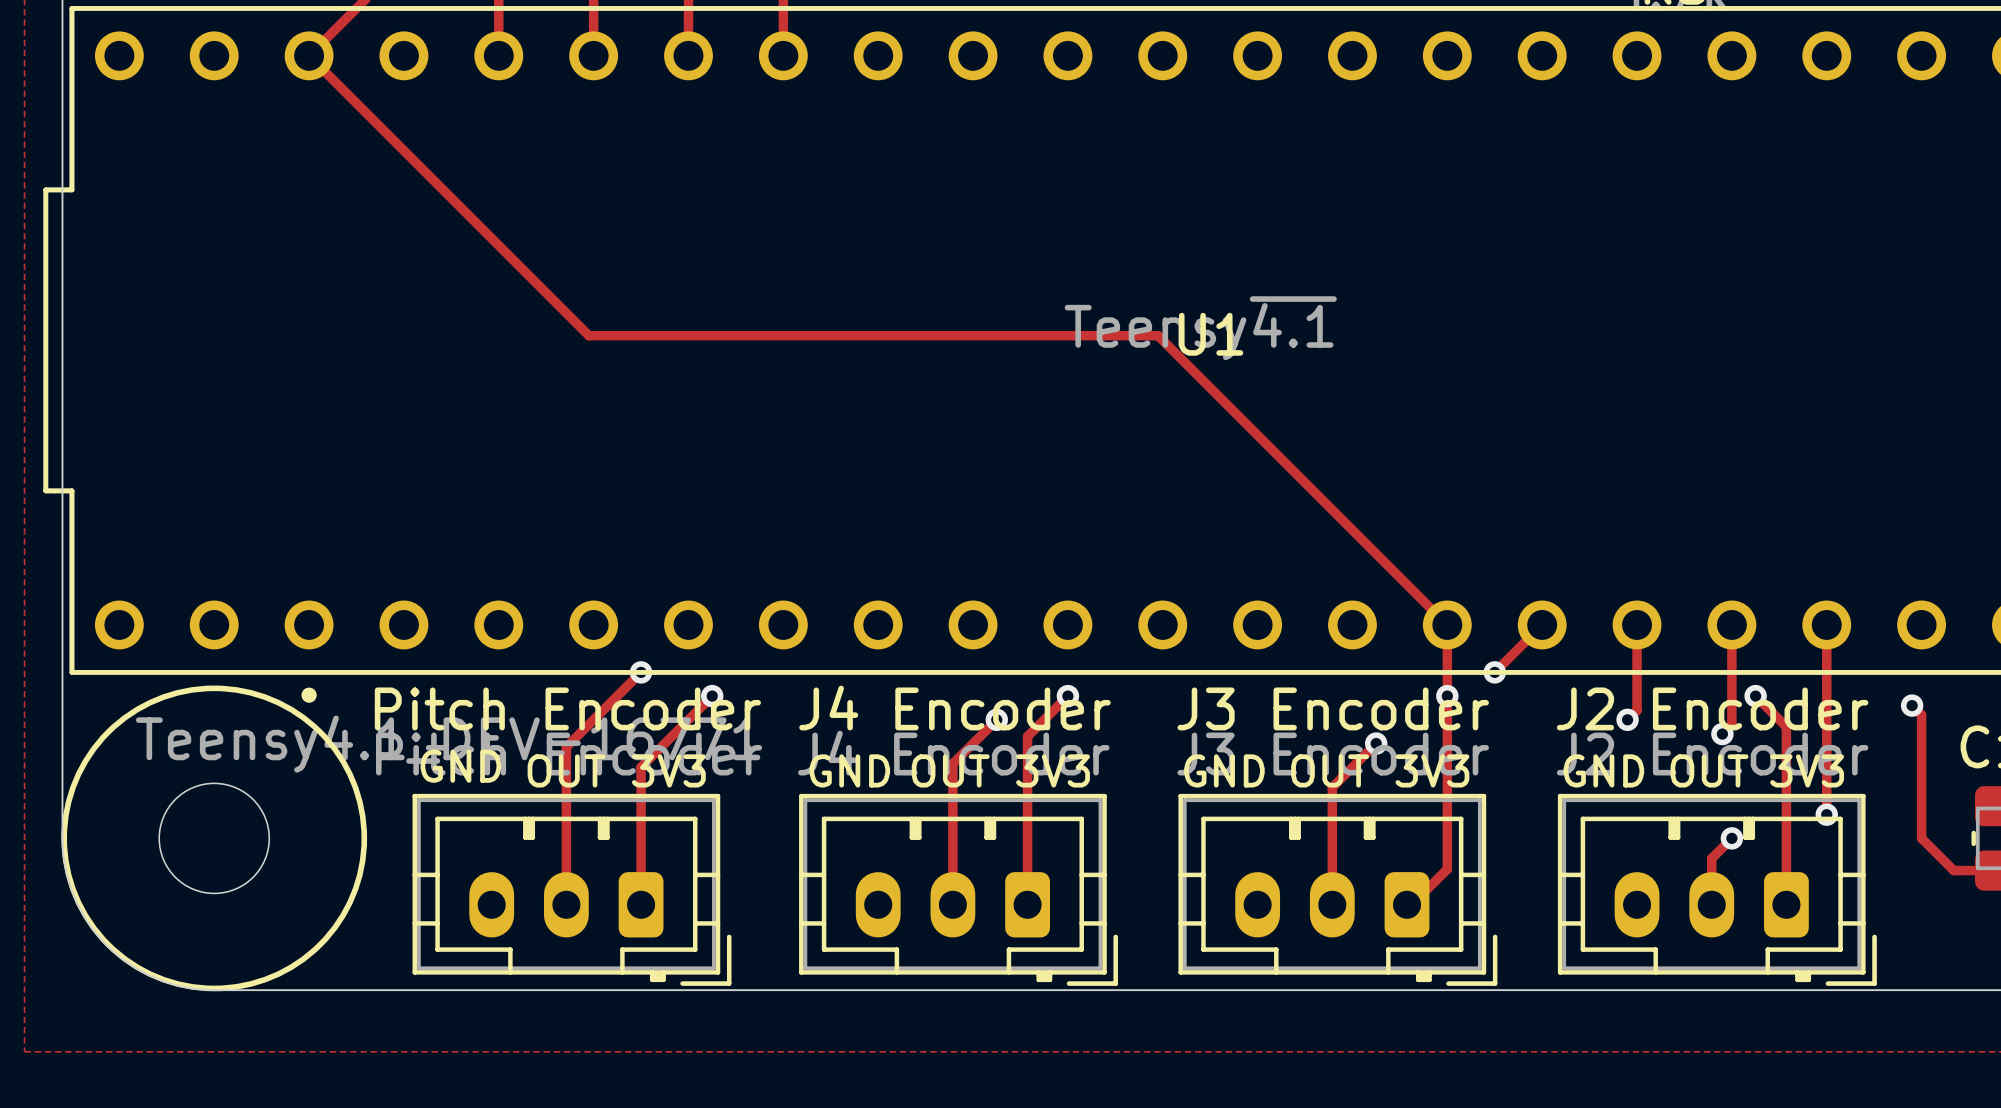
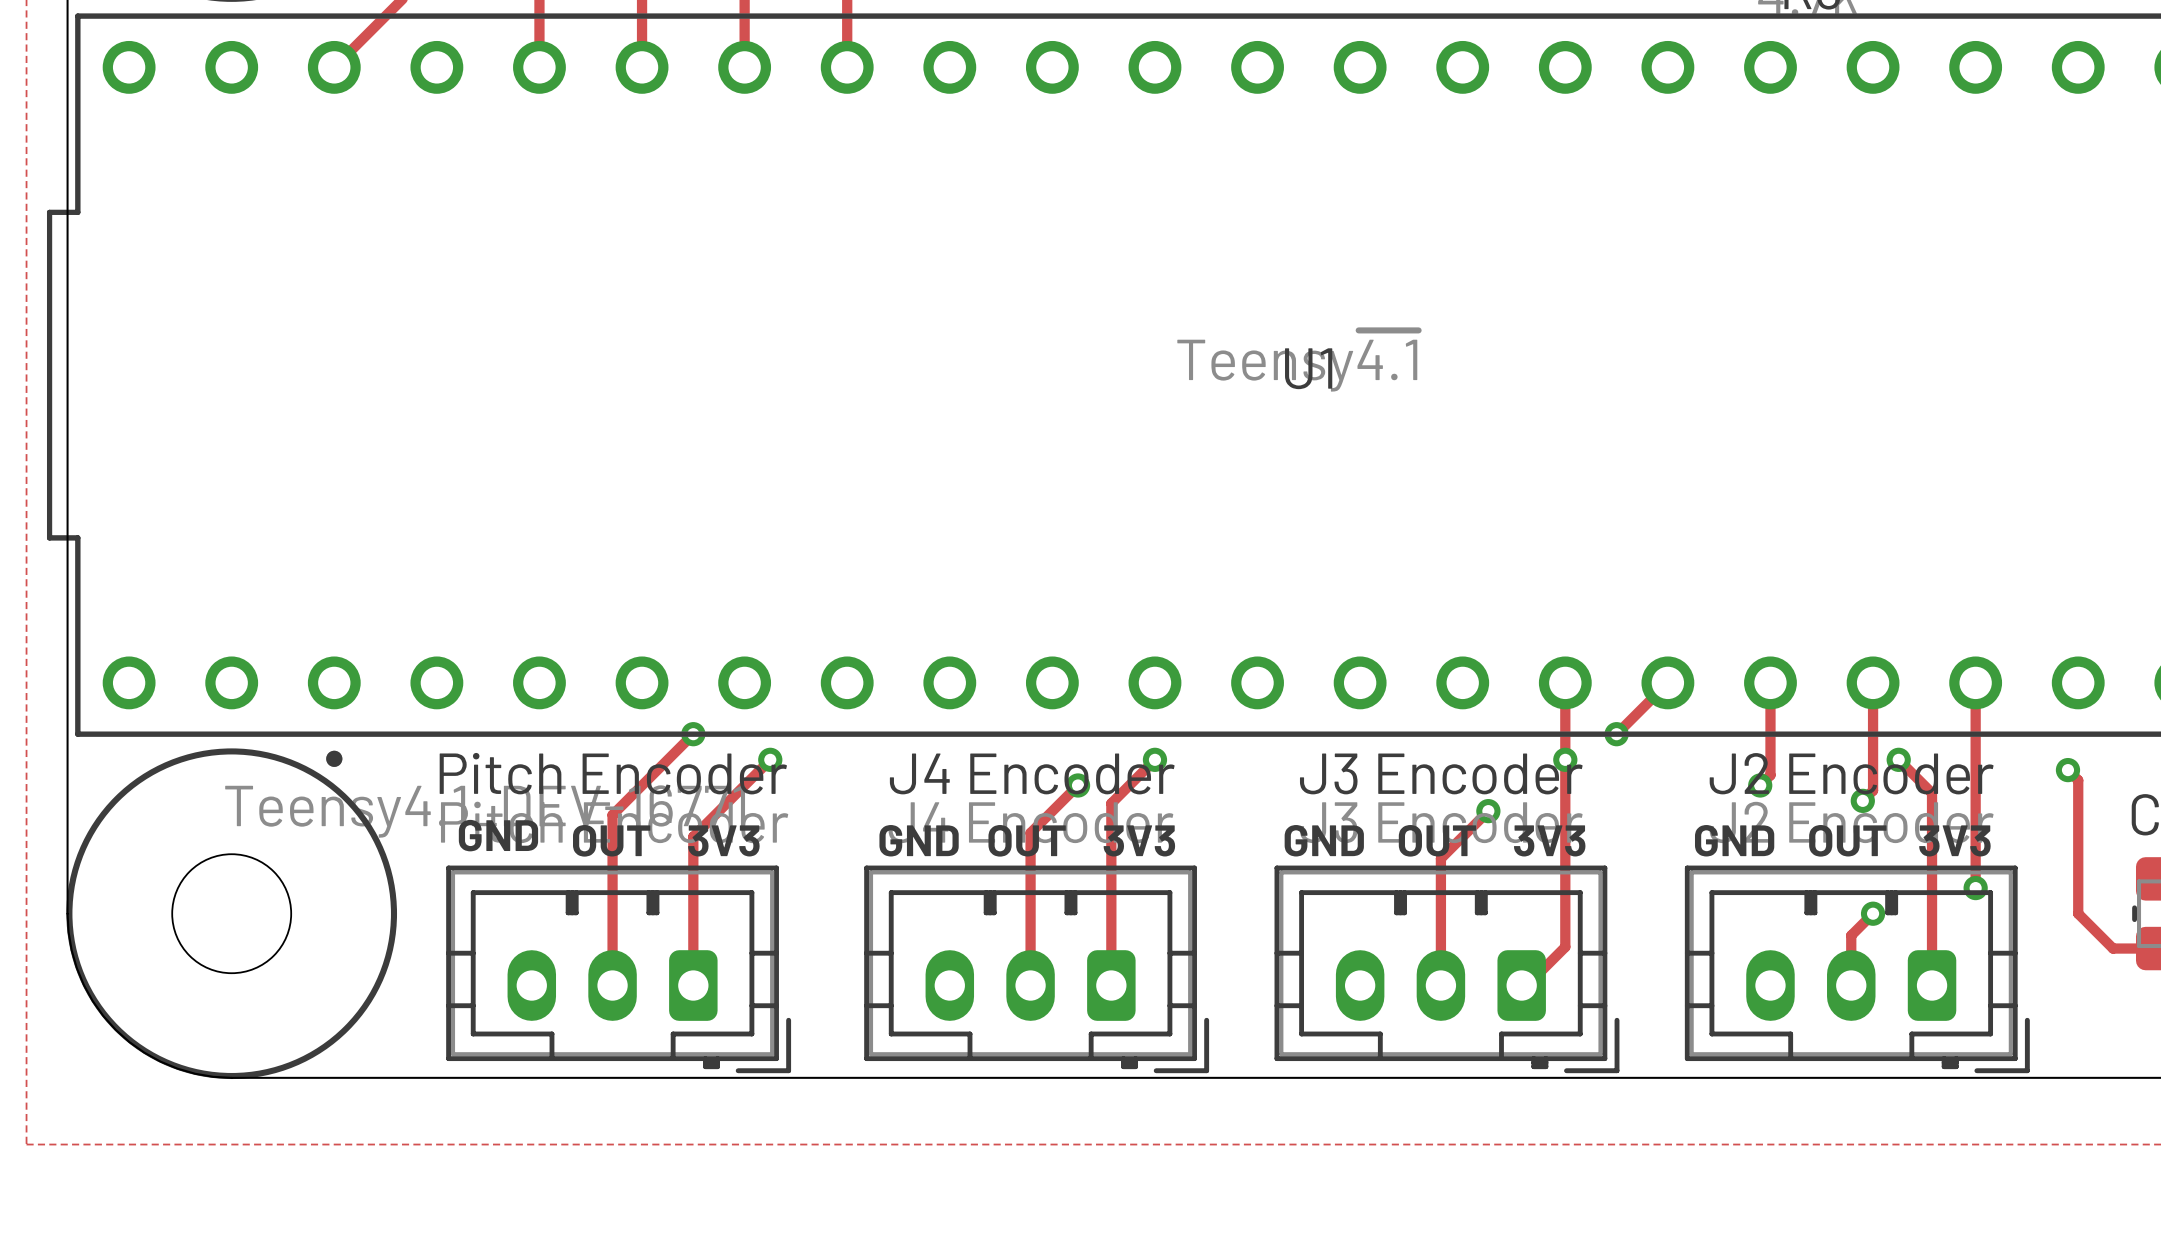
track: (309, 55) (588, 335) (1158, 335) (1447, 624) -> none

